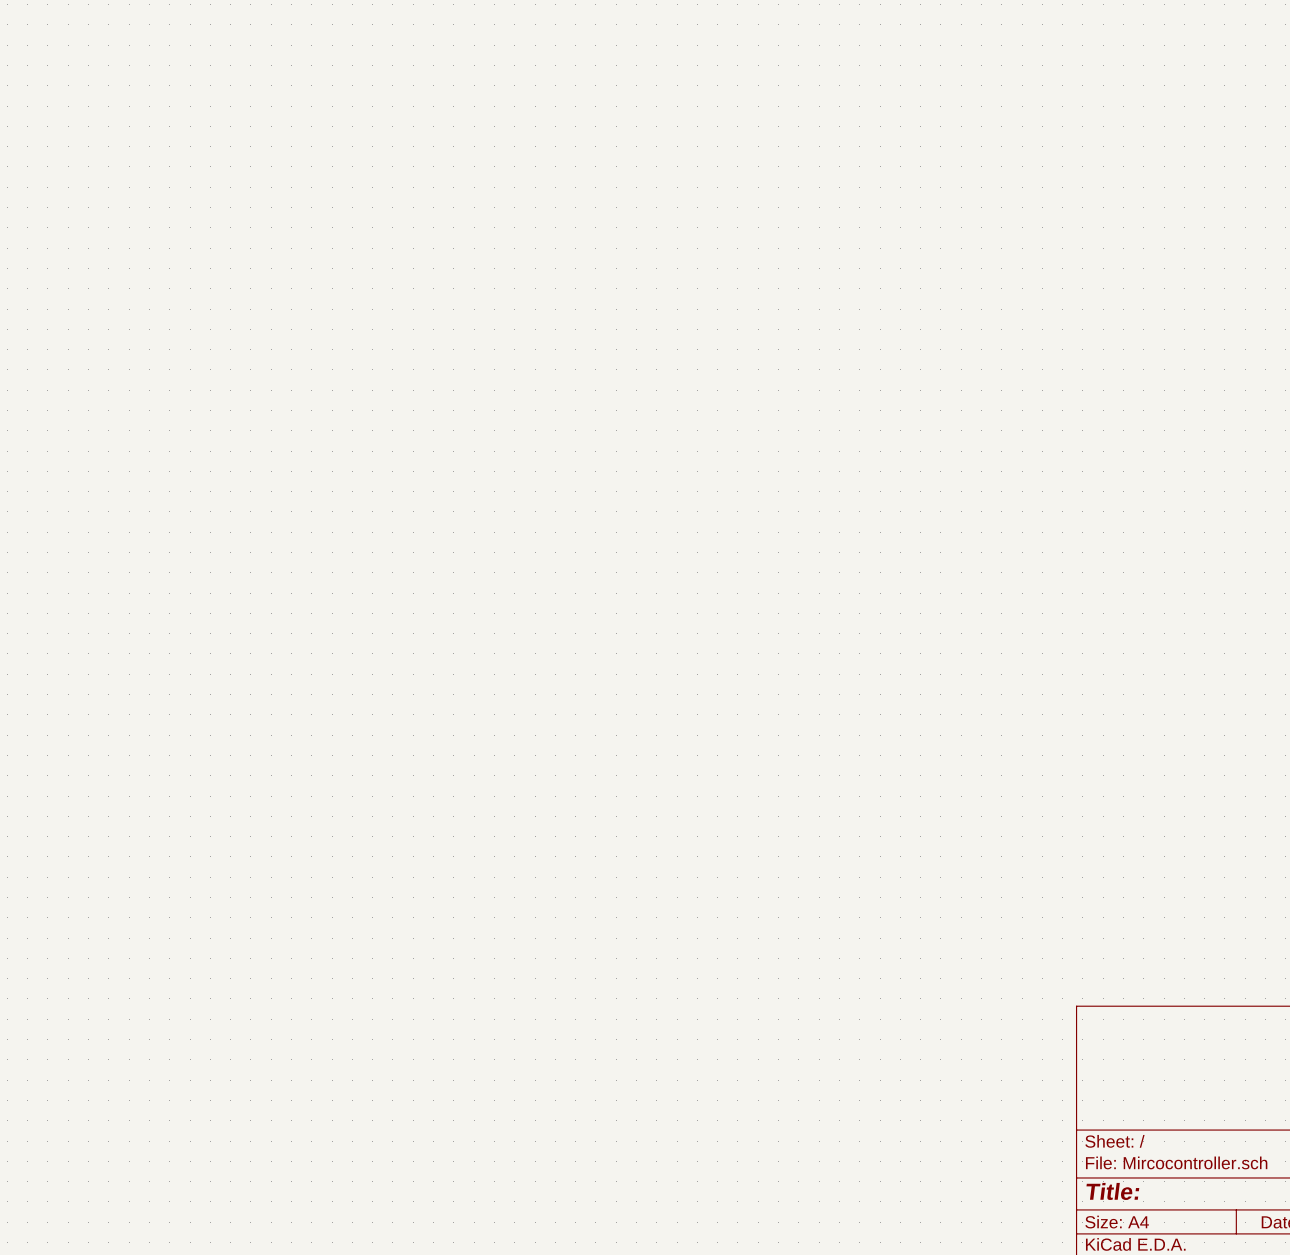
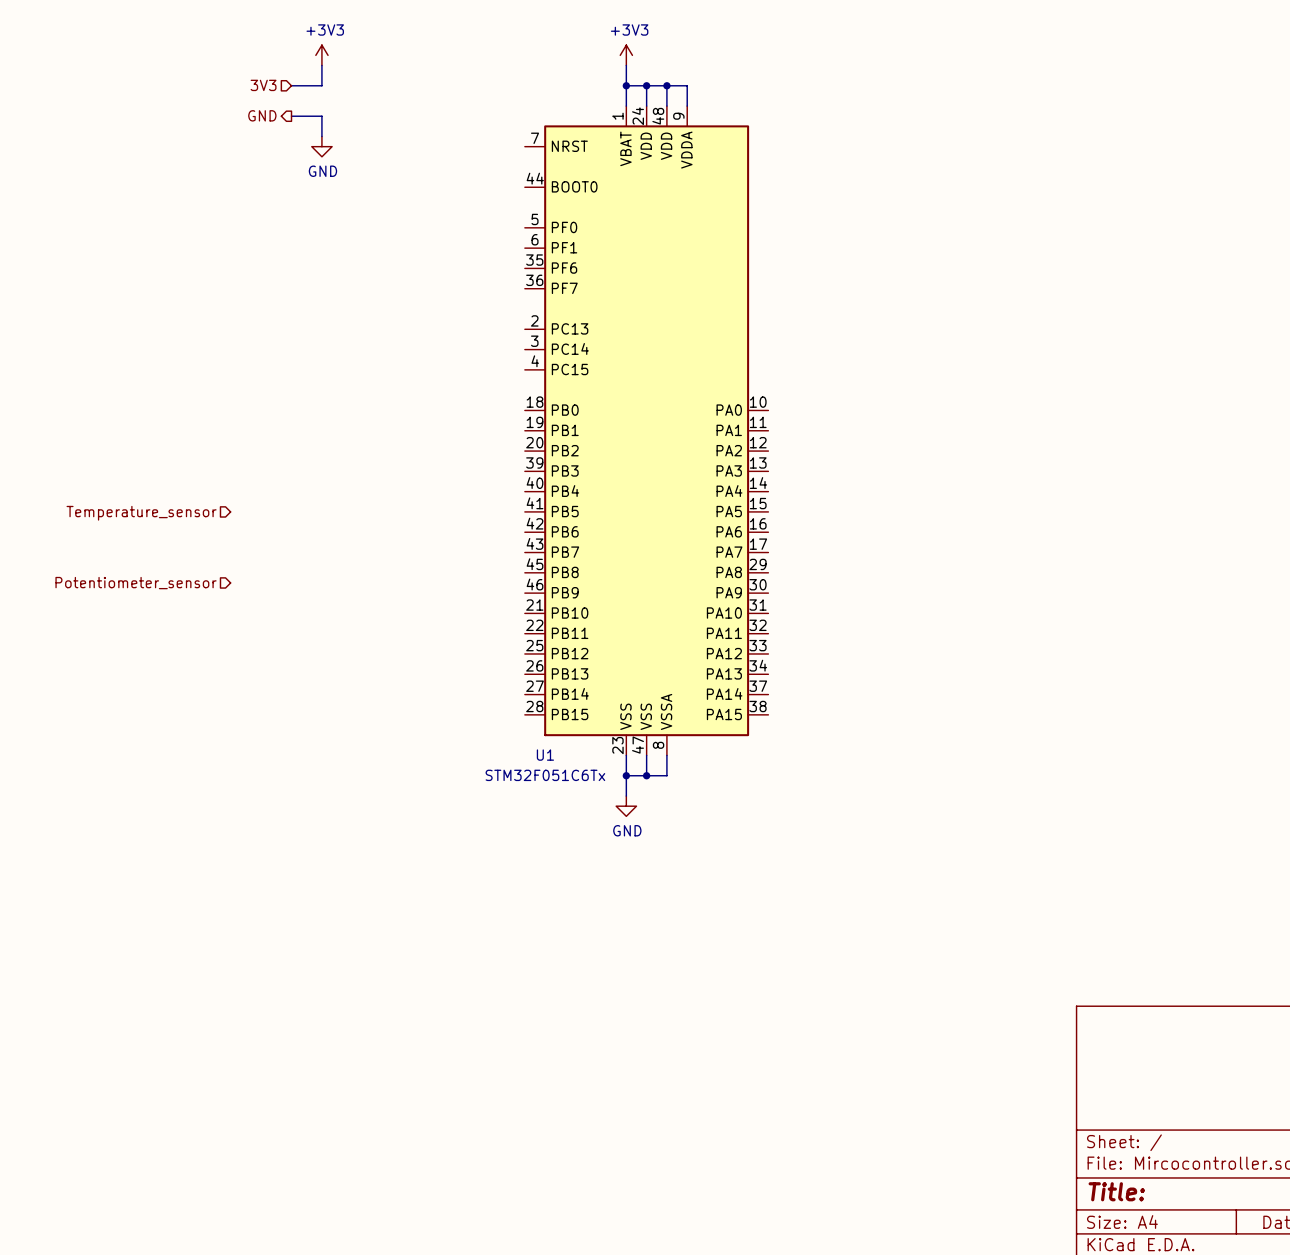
power symbol: none -> +3V3 (321, 55)
power symbol: none -> +3V3 (626, 55)
wire: none -> (321, 65) (321, 85) (291, 85)
wire: none -> (626, 65) (626, 106)
hierarchical label: none -> 3V3 (263, 85)
wire: none -> (626, 85) (687, 85) (687, 106)
junction: none -> (626, 85)
wire: none -> (646, 85) (646, 106)
junction: none -> (646, 85)
wire: none -> (666, 85) (666, 106)
junction: none -> (666, 85)
hierarchical label: none -> GND (262, 115)
wire: none -> (291, 116) (321, 116) (321, 136)
power symbol: none -> GND (321, 146)
U1: none -> STM32F051C6Tx (646, 430)
hierarchical label: none -> Temperature_sensor (141, 513)
hierarchical label: none -> Potentiometer_sensor (136, 583)
wire: none -> (626, 755) (626, 796)
wire: none -> (646, 755) (646, 775)
wire: none -> (666, 755) (666, 775) (626, 775)
junction: none -> (626, 775)
junction: none -> (646, 775)
power symbol: none -> GND (626, 806)

